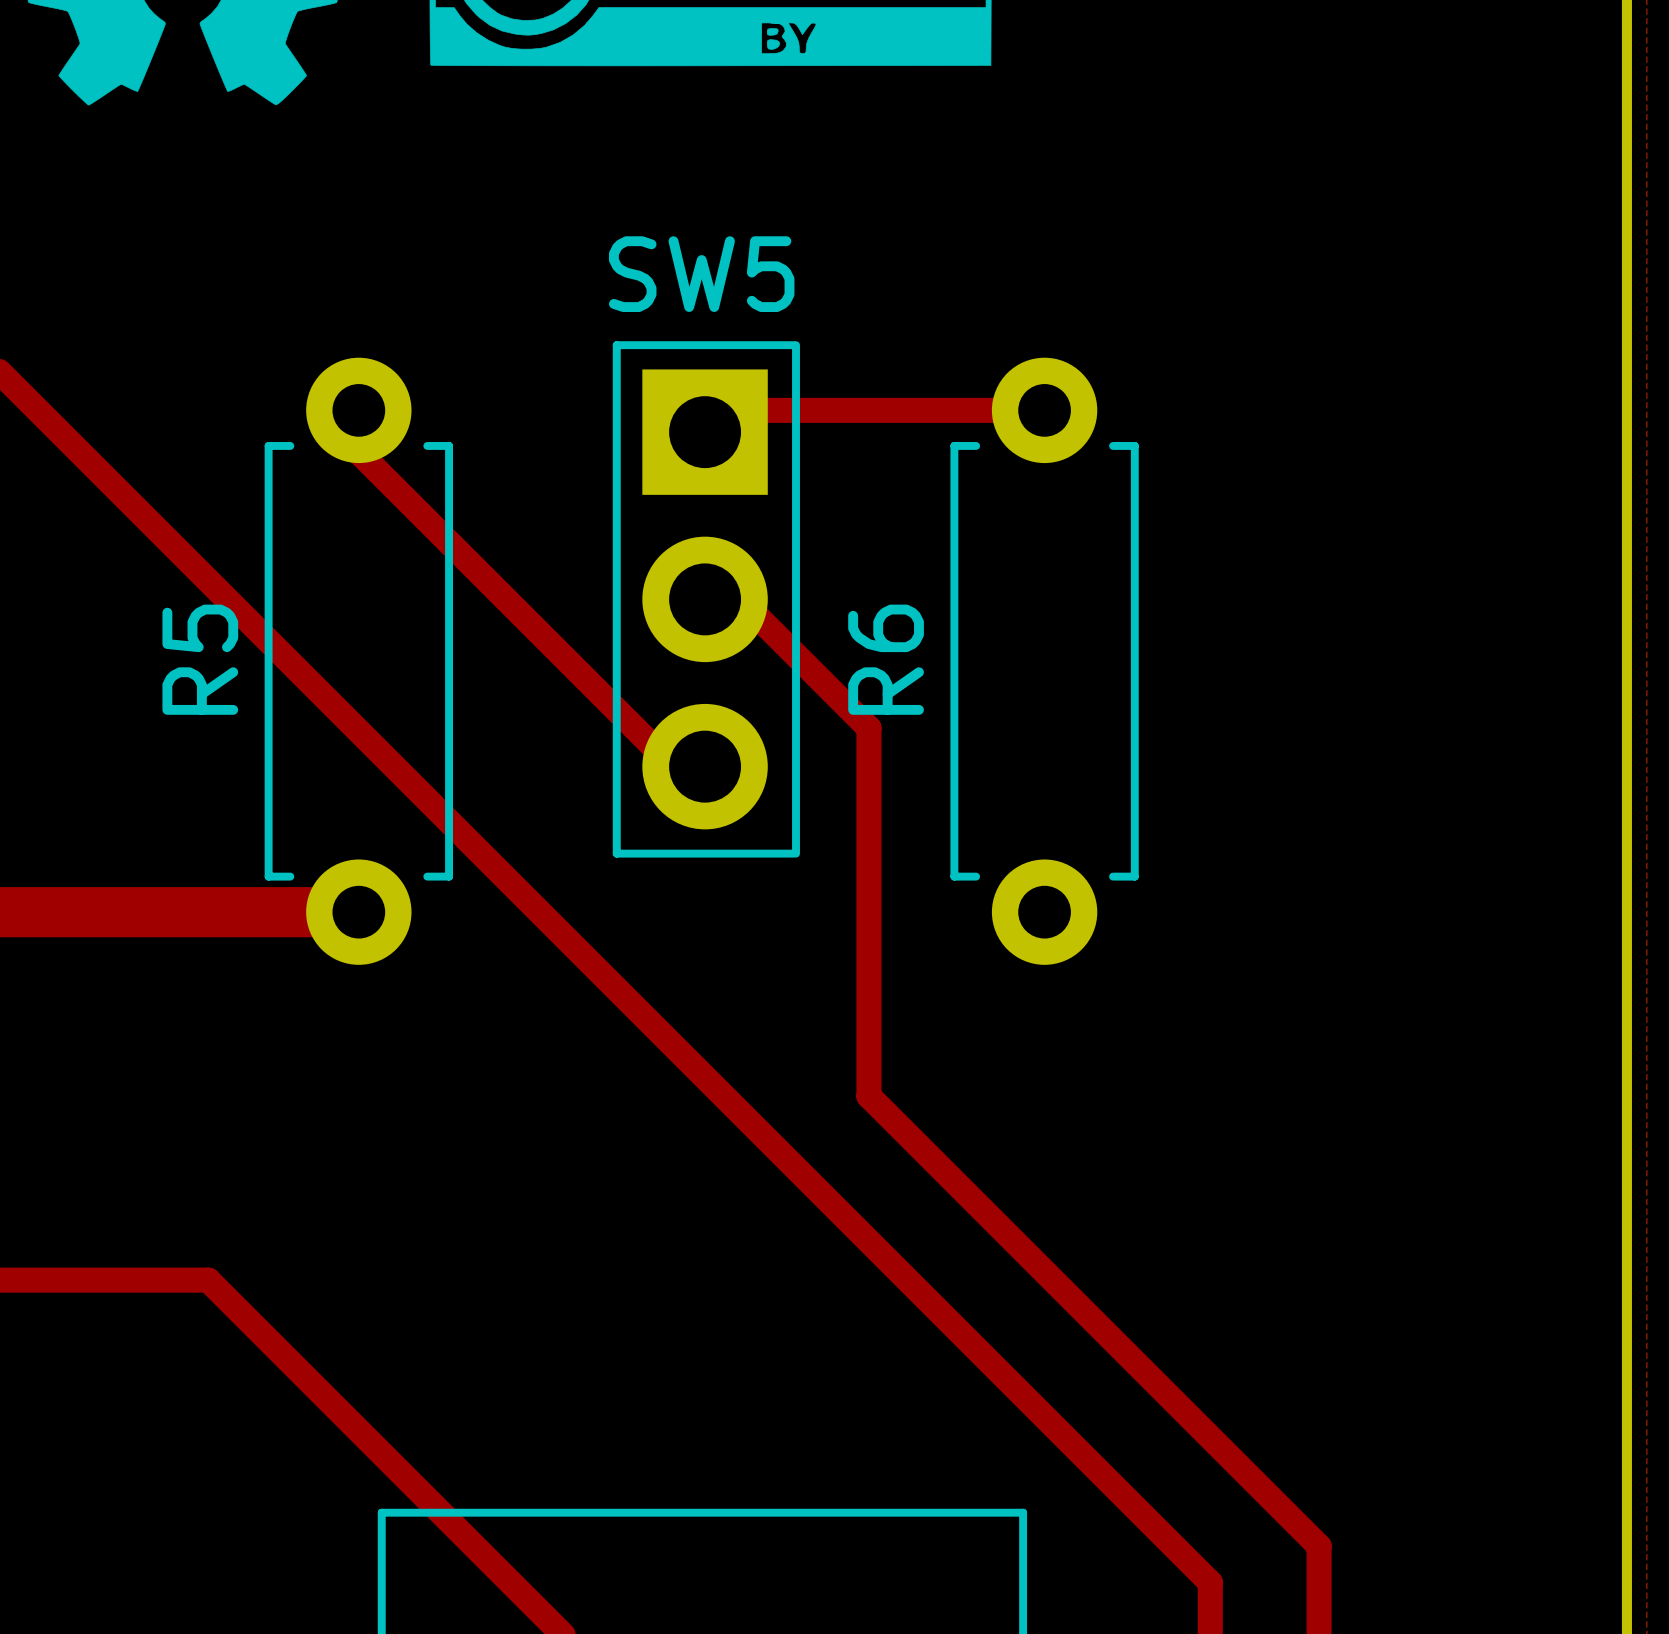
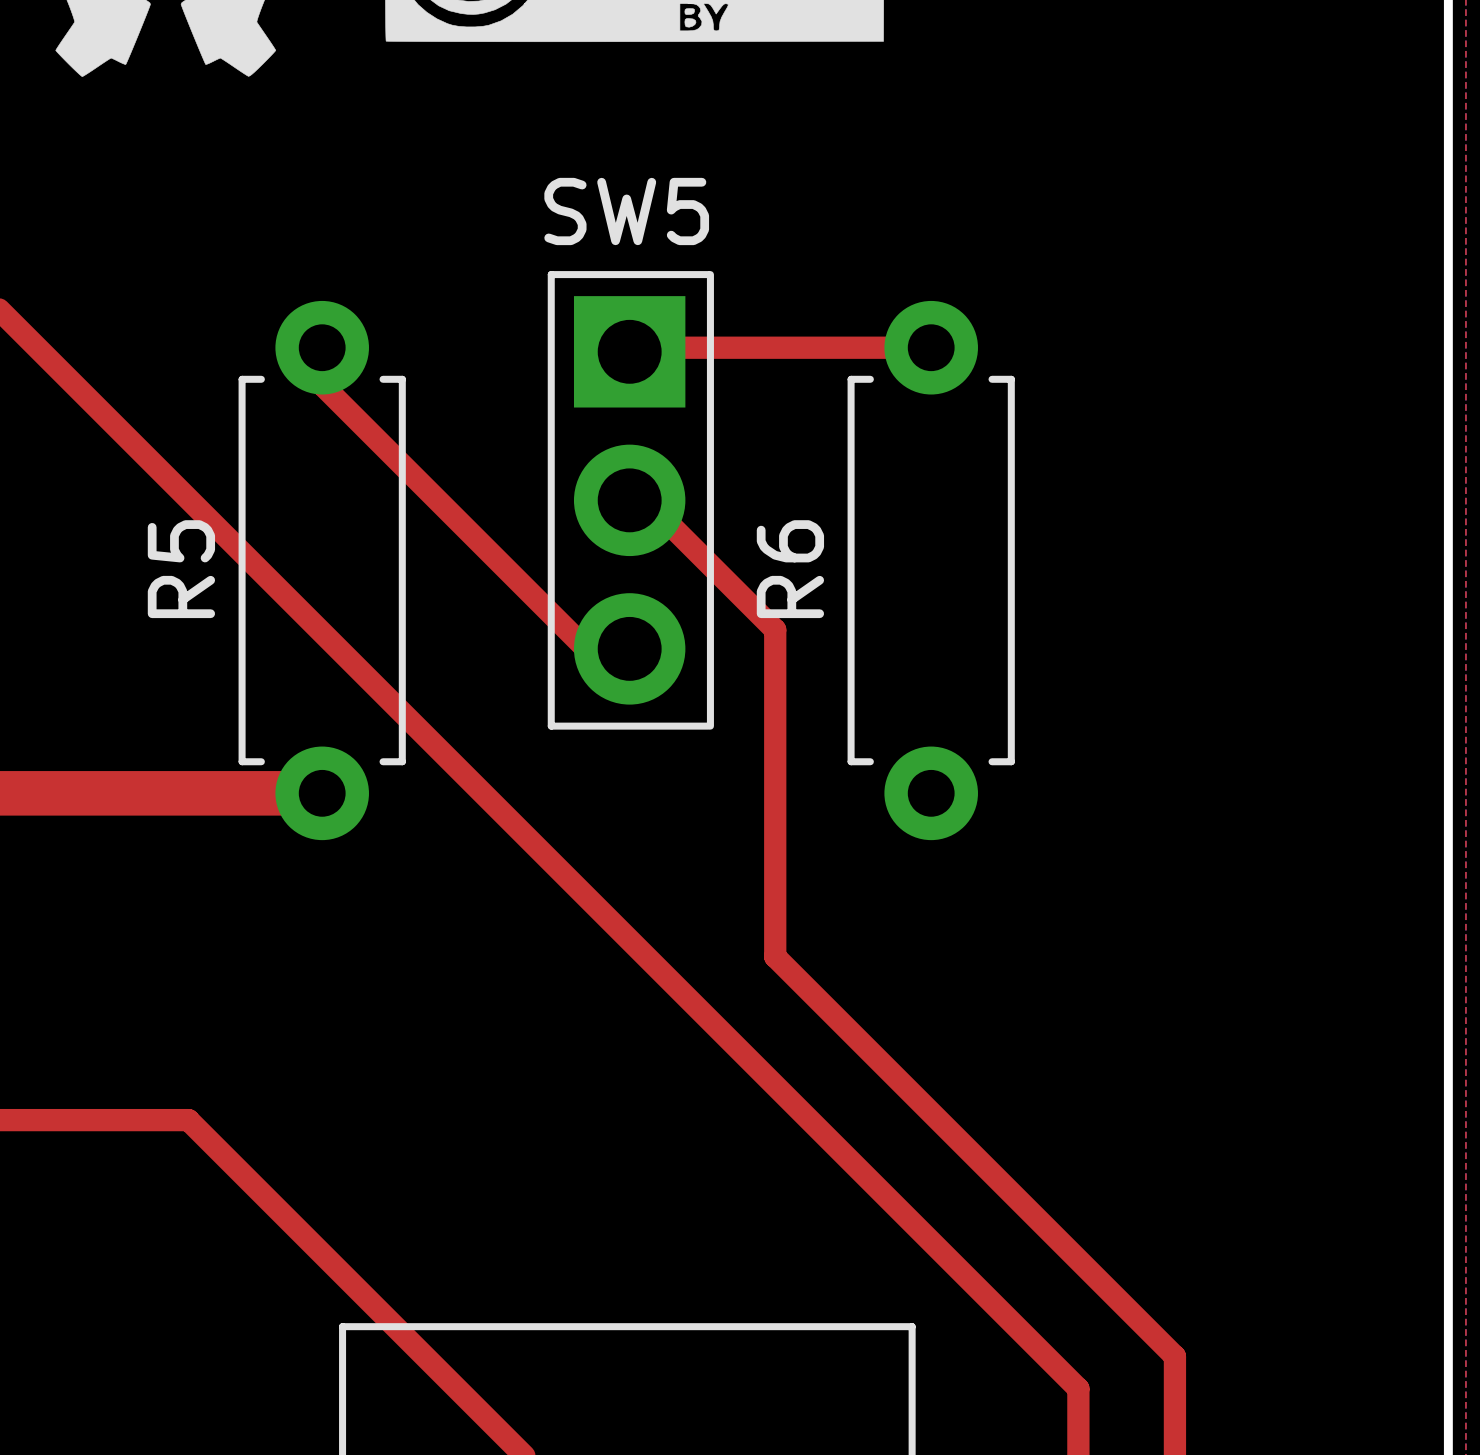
SW5 position: (706, 599) -> (630, 500)

